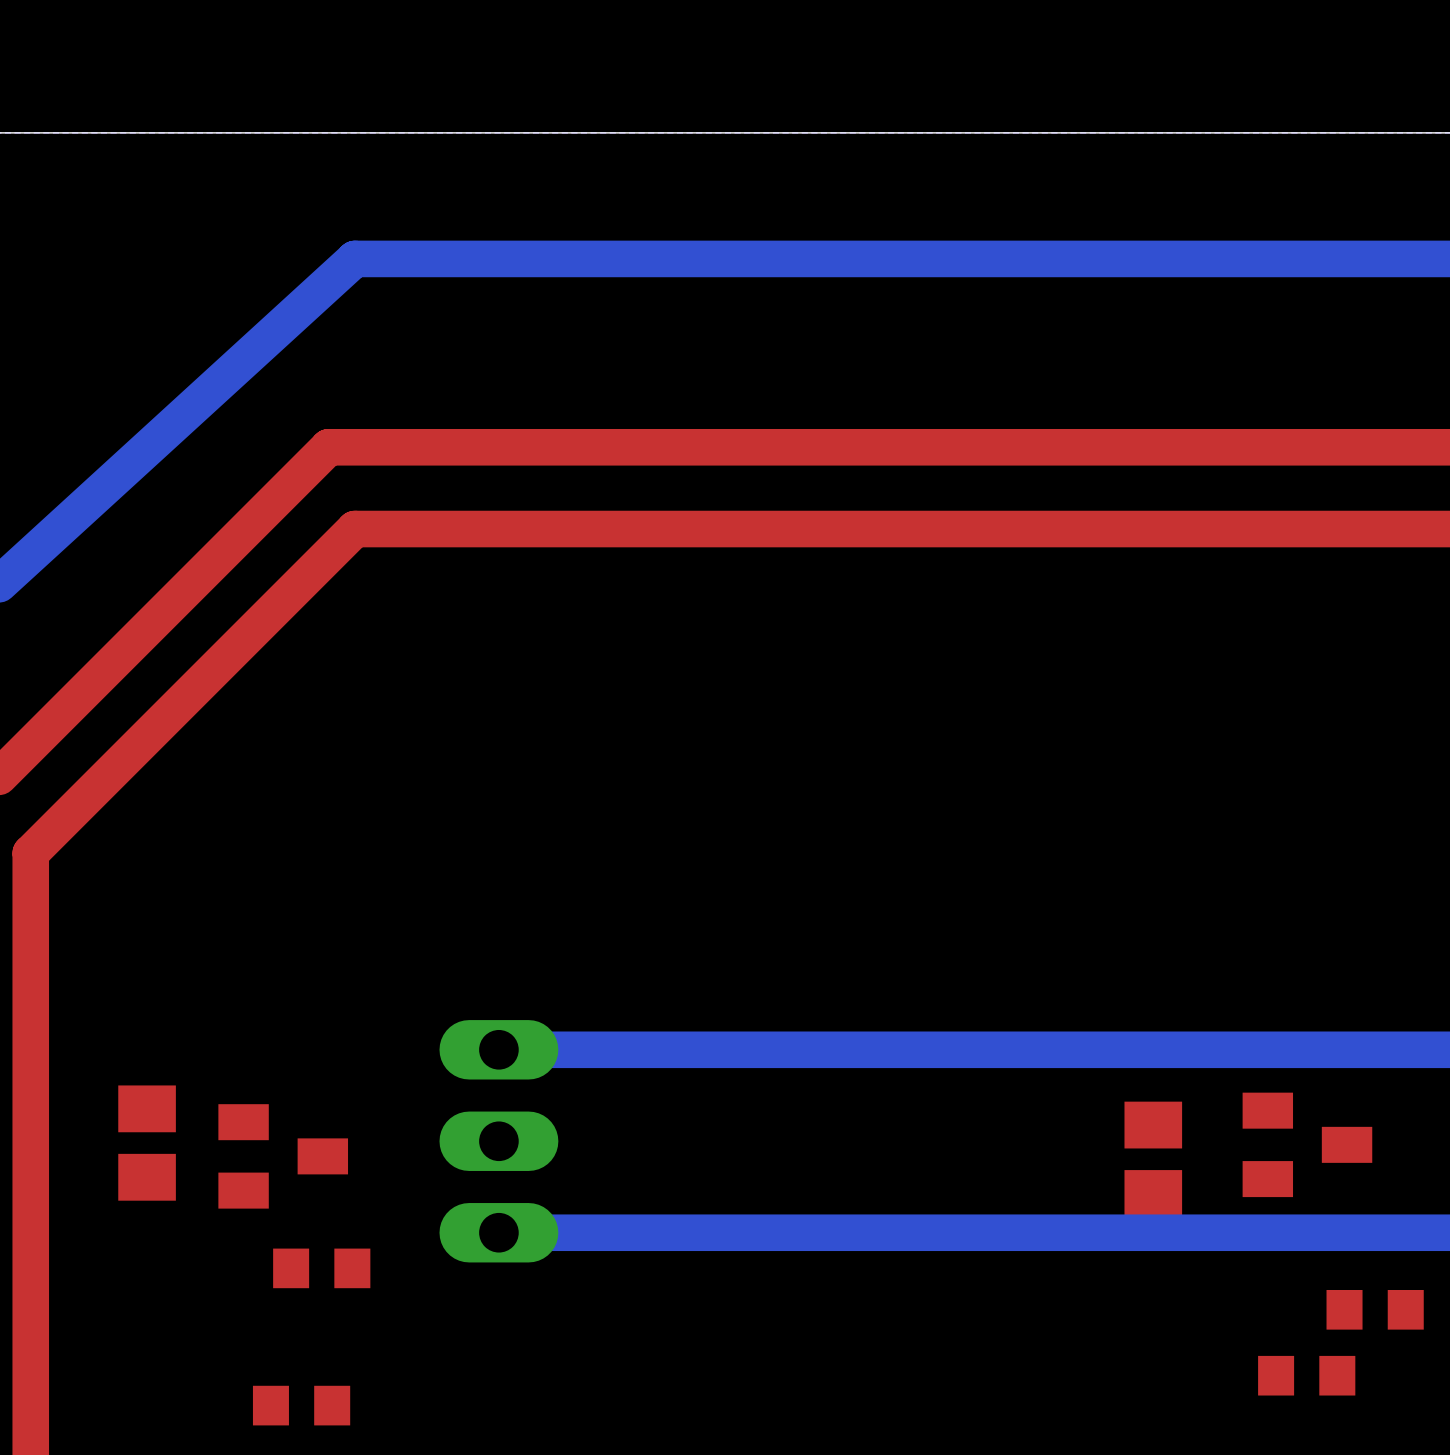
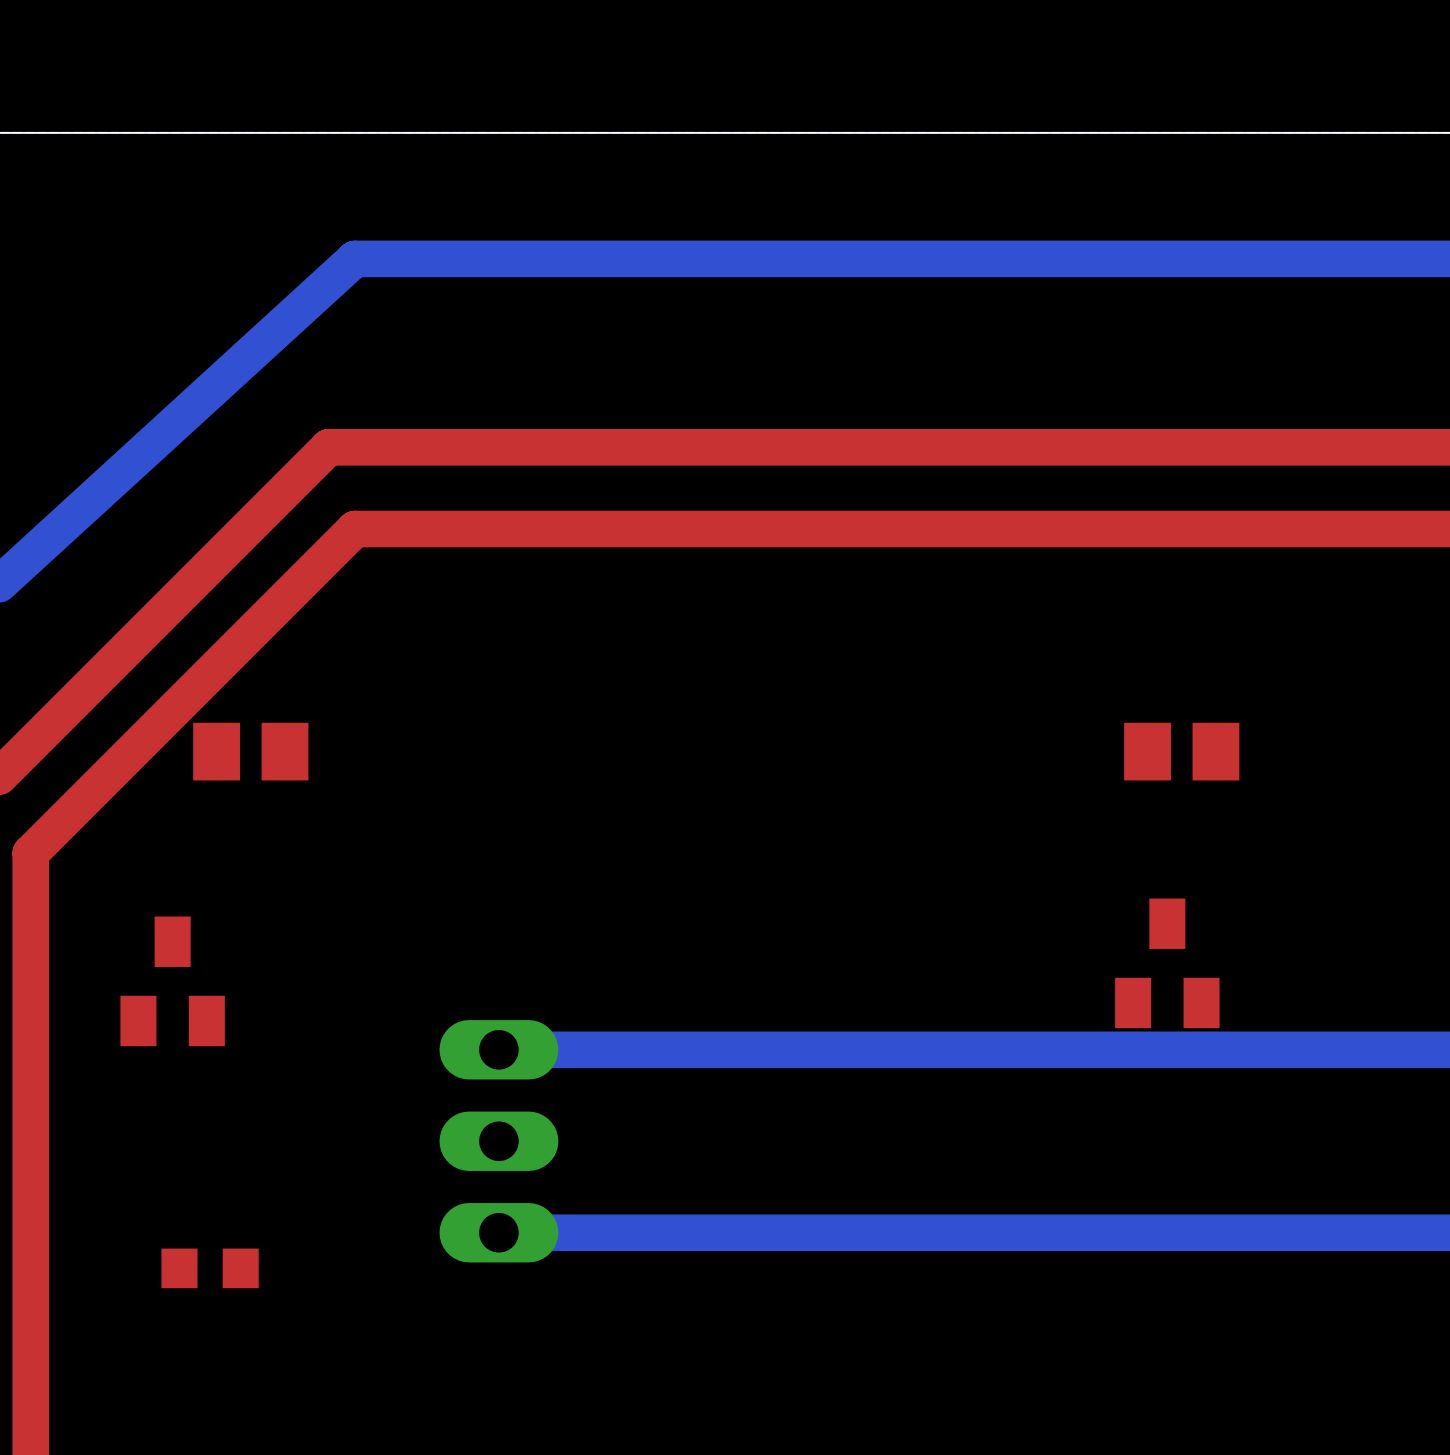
part rotation: 0° (147, 1143) -> 90° clockwise (250, 751)
part position: (147, 1143) -> (250, 751)
part rotation: 0° (1307, 1144) -> 90° counterclockwise (1167, 963)
part position: (1307, 1144) -> (1167, 963)
part rotation: 0° (283, 1156) -> 90° counterclockwise (172, 981)
part position: (283, 1156) -> (172, 981)
part rotation: 0° (1153, 1159) -> 90° clockwise (1181, 751)
part position: (1153, 1159) -> (1181, 751)
part: none -> (210, 1268)
part: (321, 1268) -> none
part: (1375, 1309) -> none
part: (1306, 1375) -> none
part: (301, 1405) -> none

